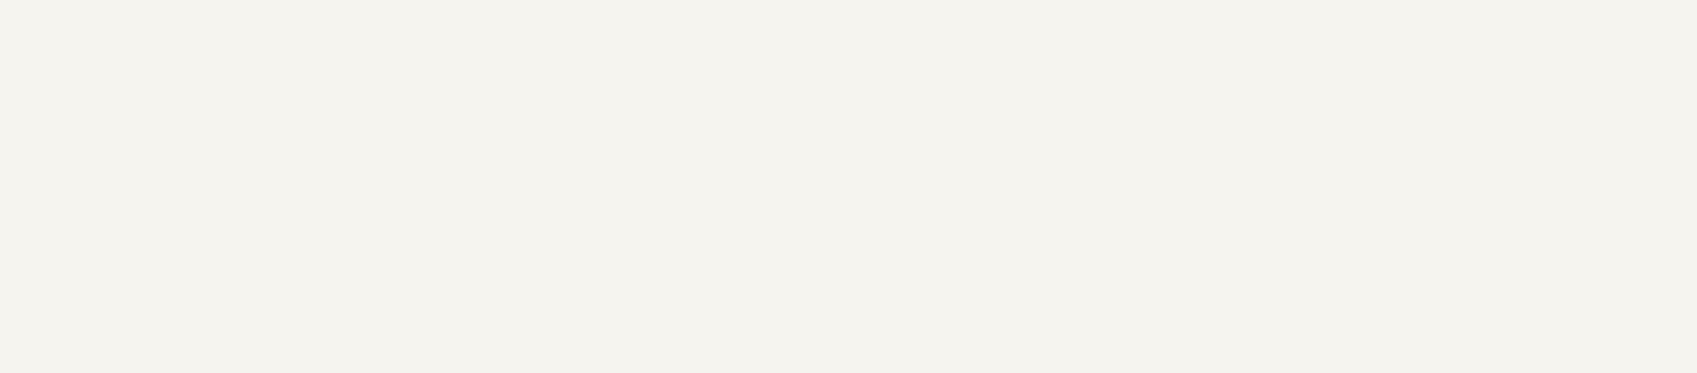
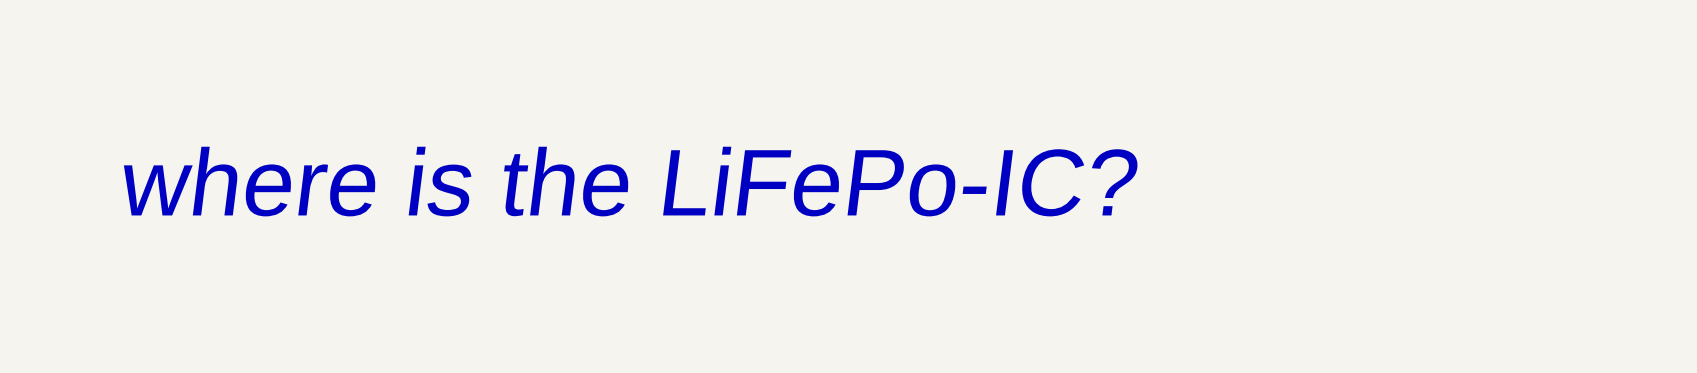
text: none -> where is the LiFePo-IC? (631, 181)

